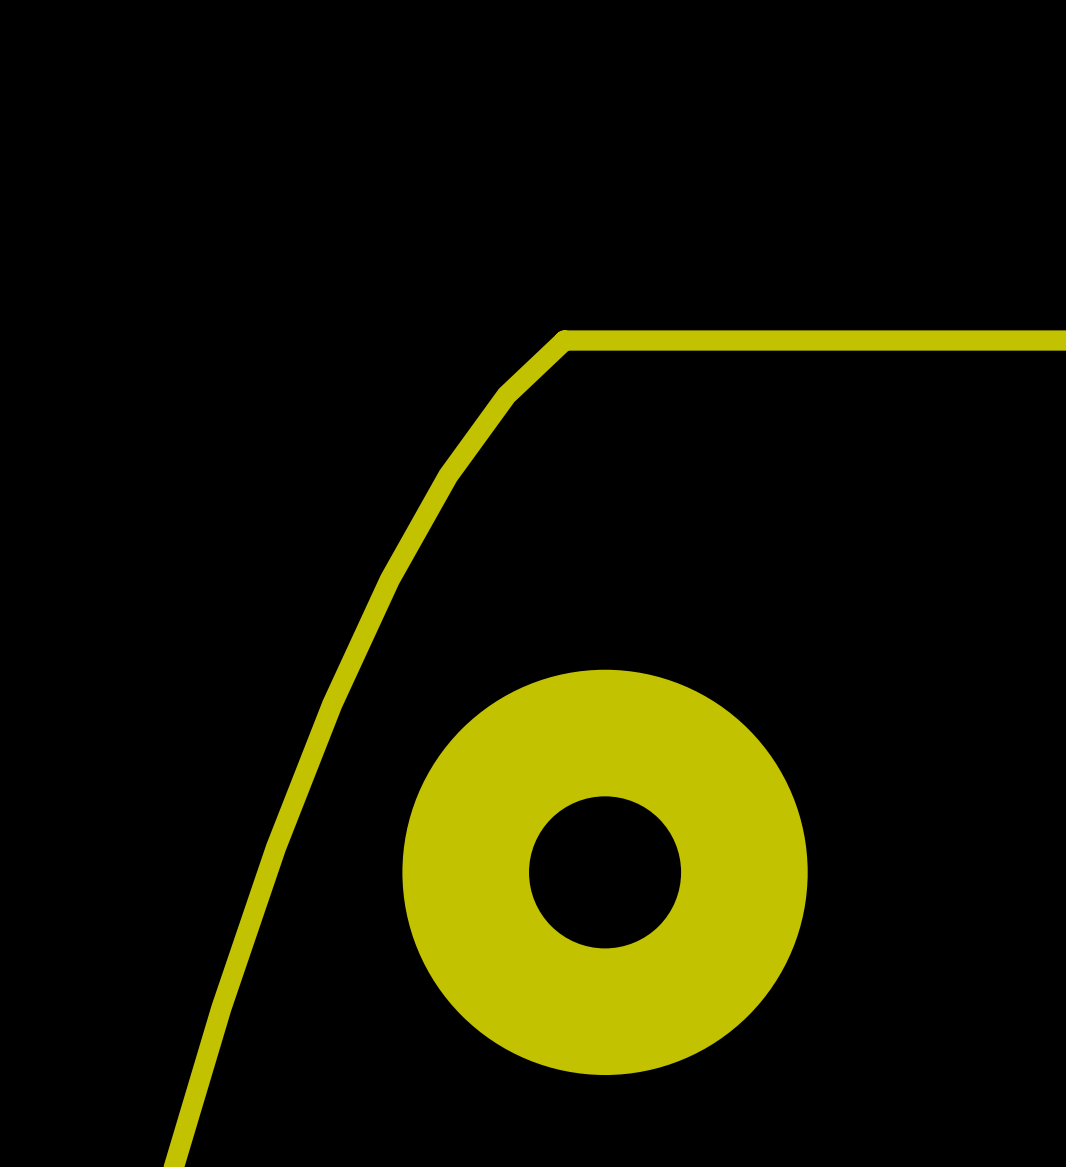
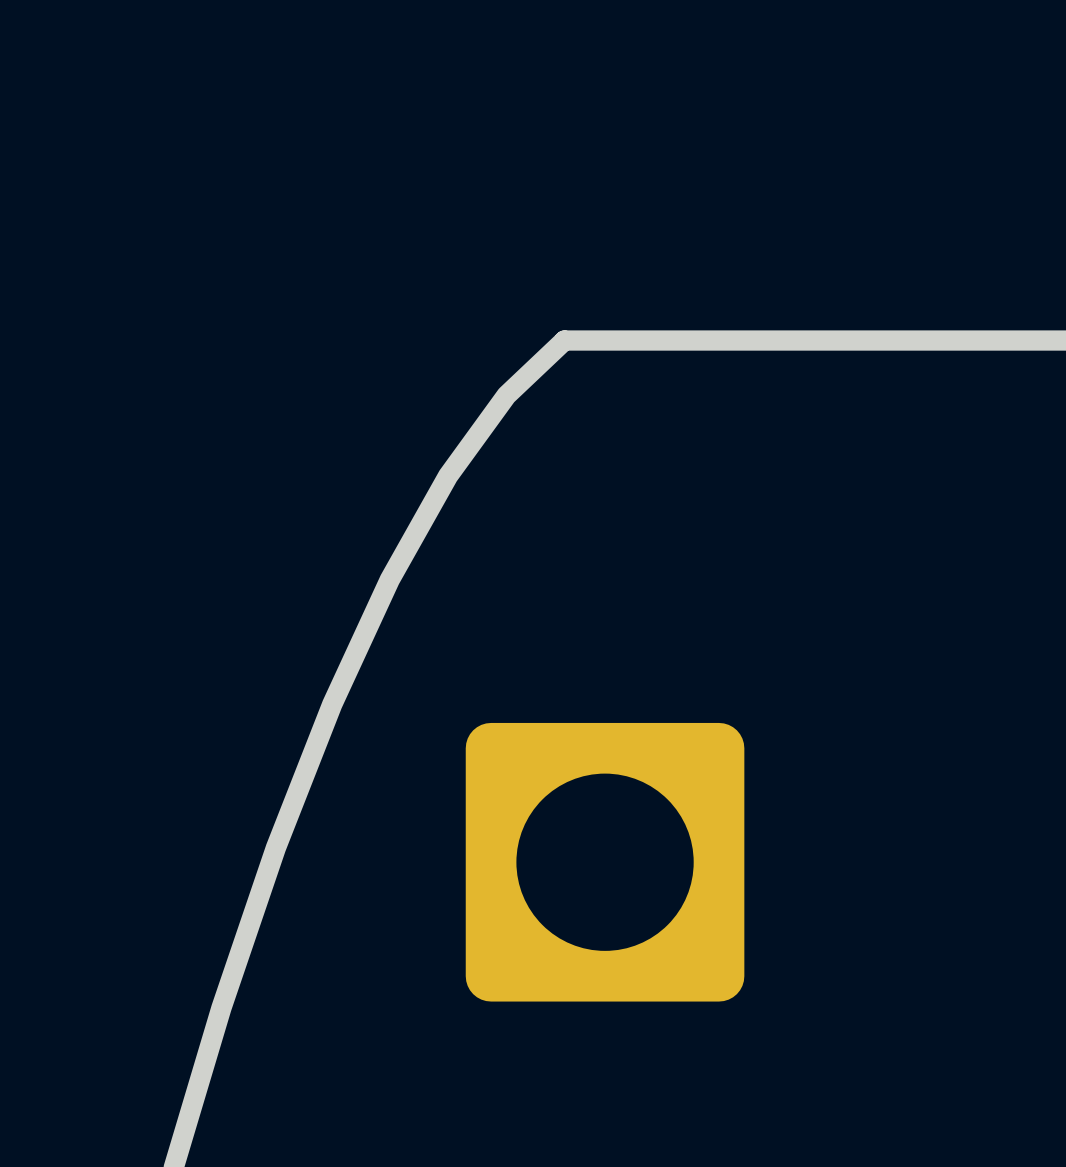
part footprint: [402, 669, 808, 1076] -> [465, 722, 745, 1002]

